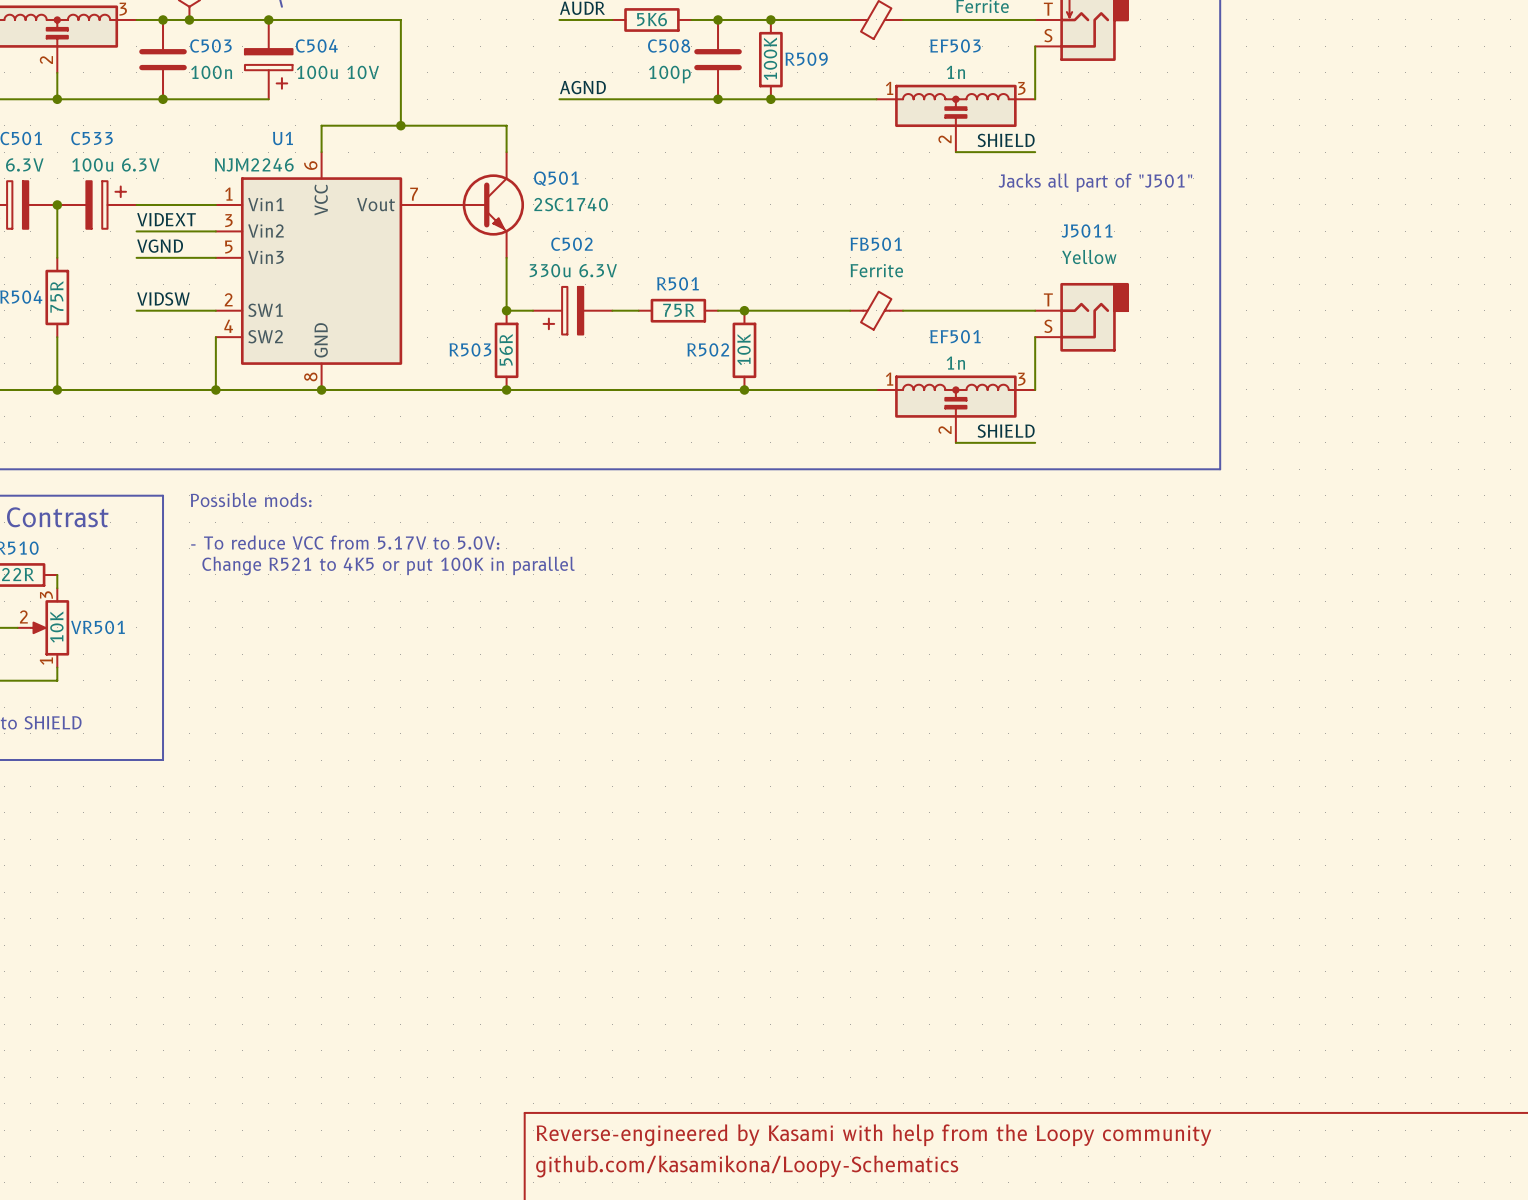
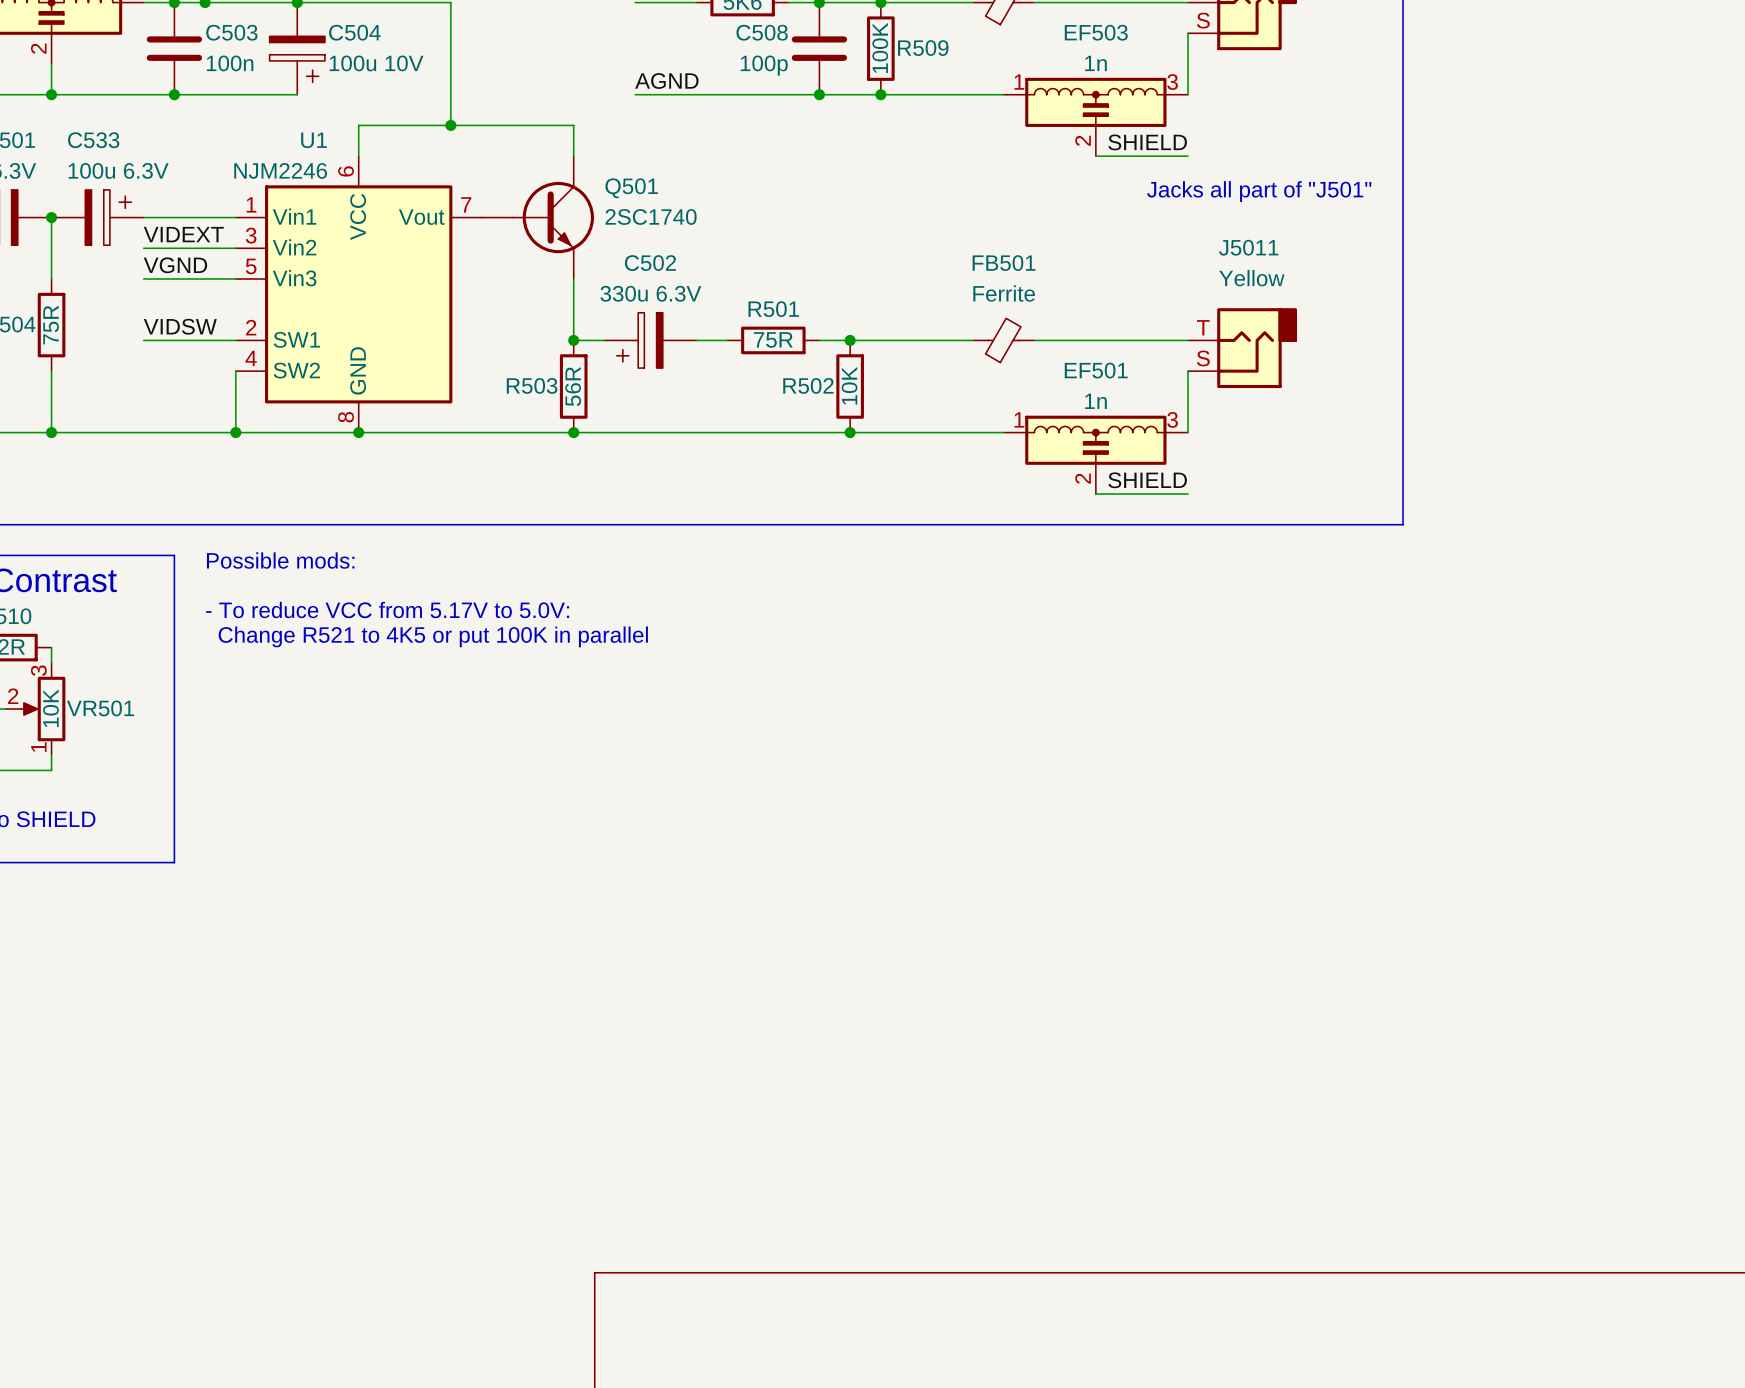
title block: Reverse-engineered by Kasami with help from the Loopy community (873, 1135) -> none
title block: github.com/kasamikona/Loopy-Schematics (747, 1166) -> none

